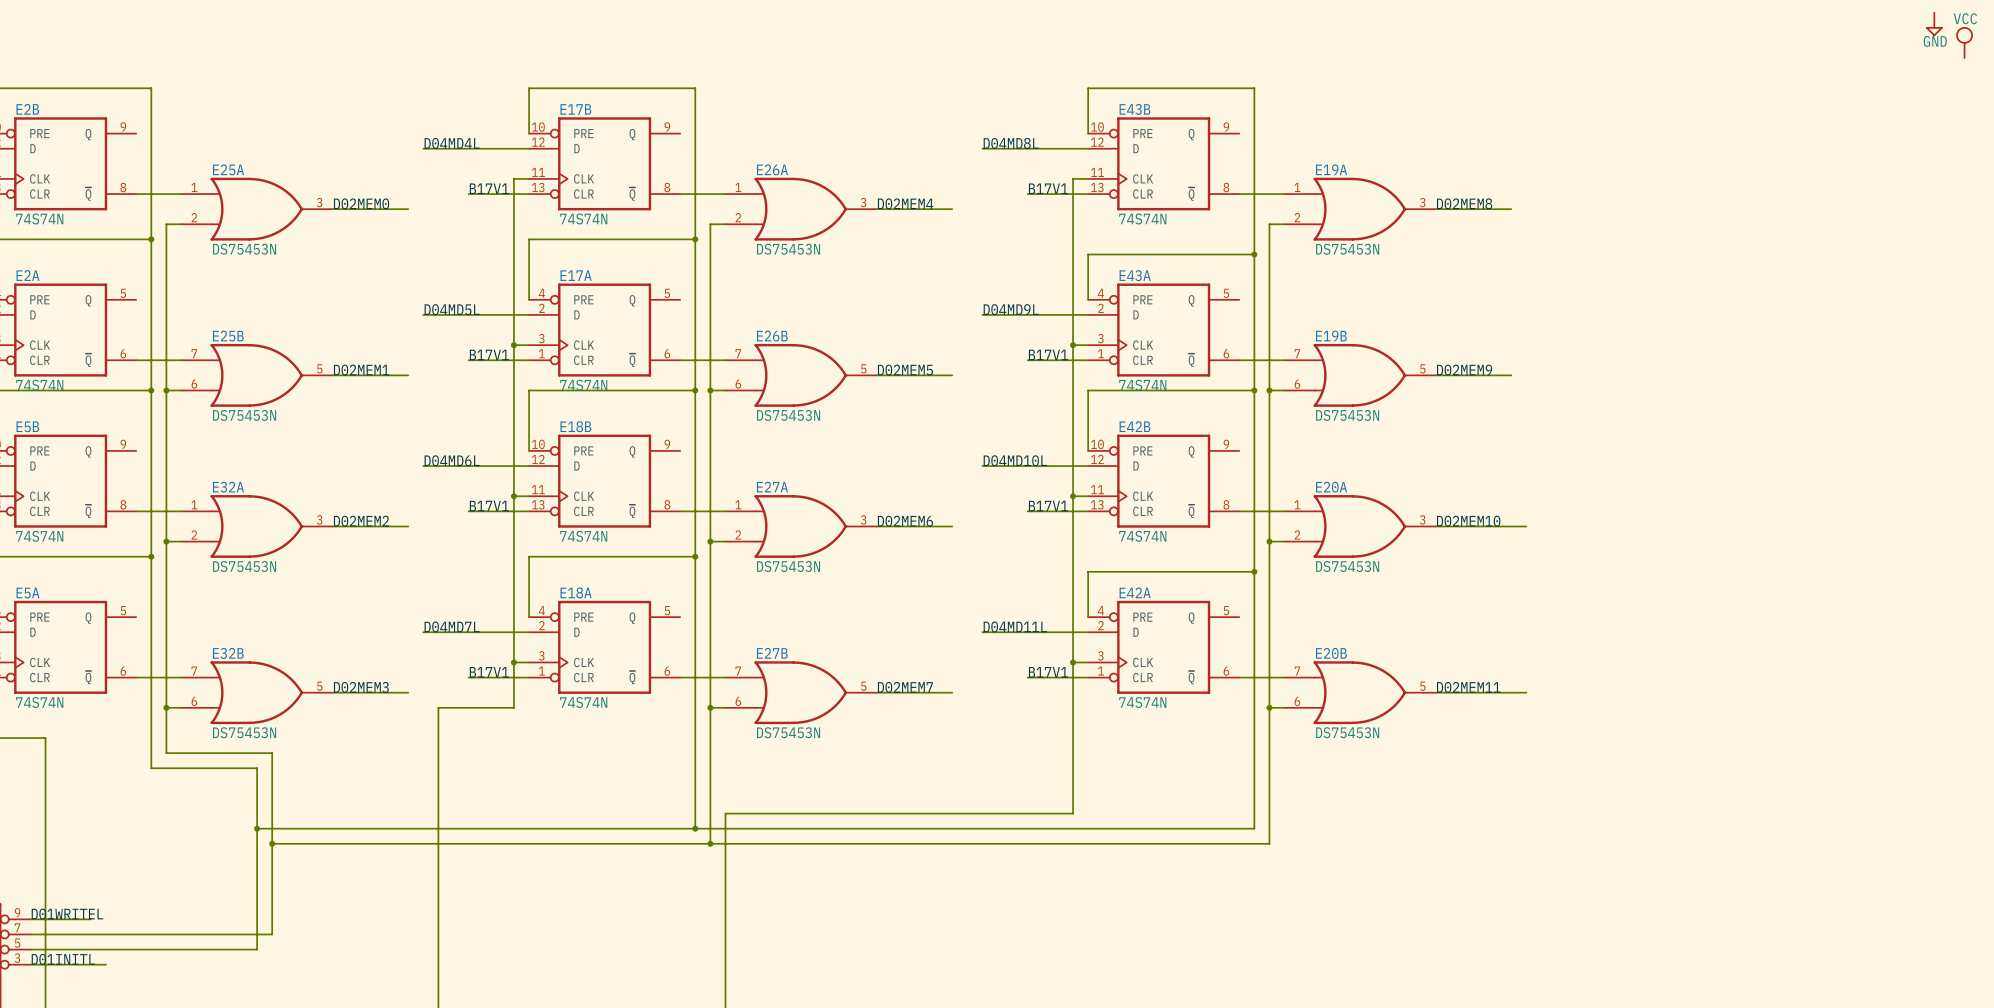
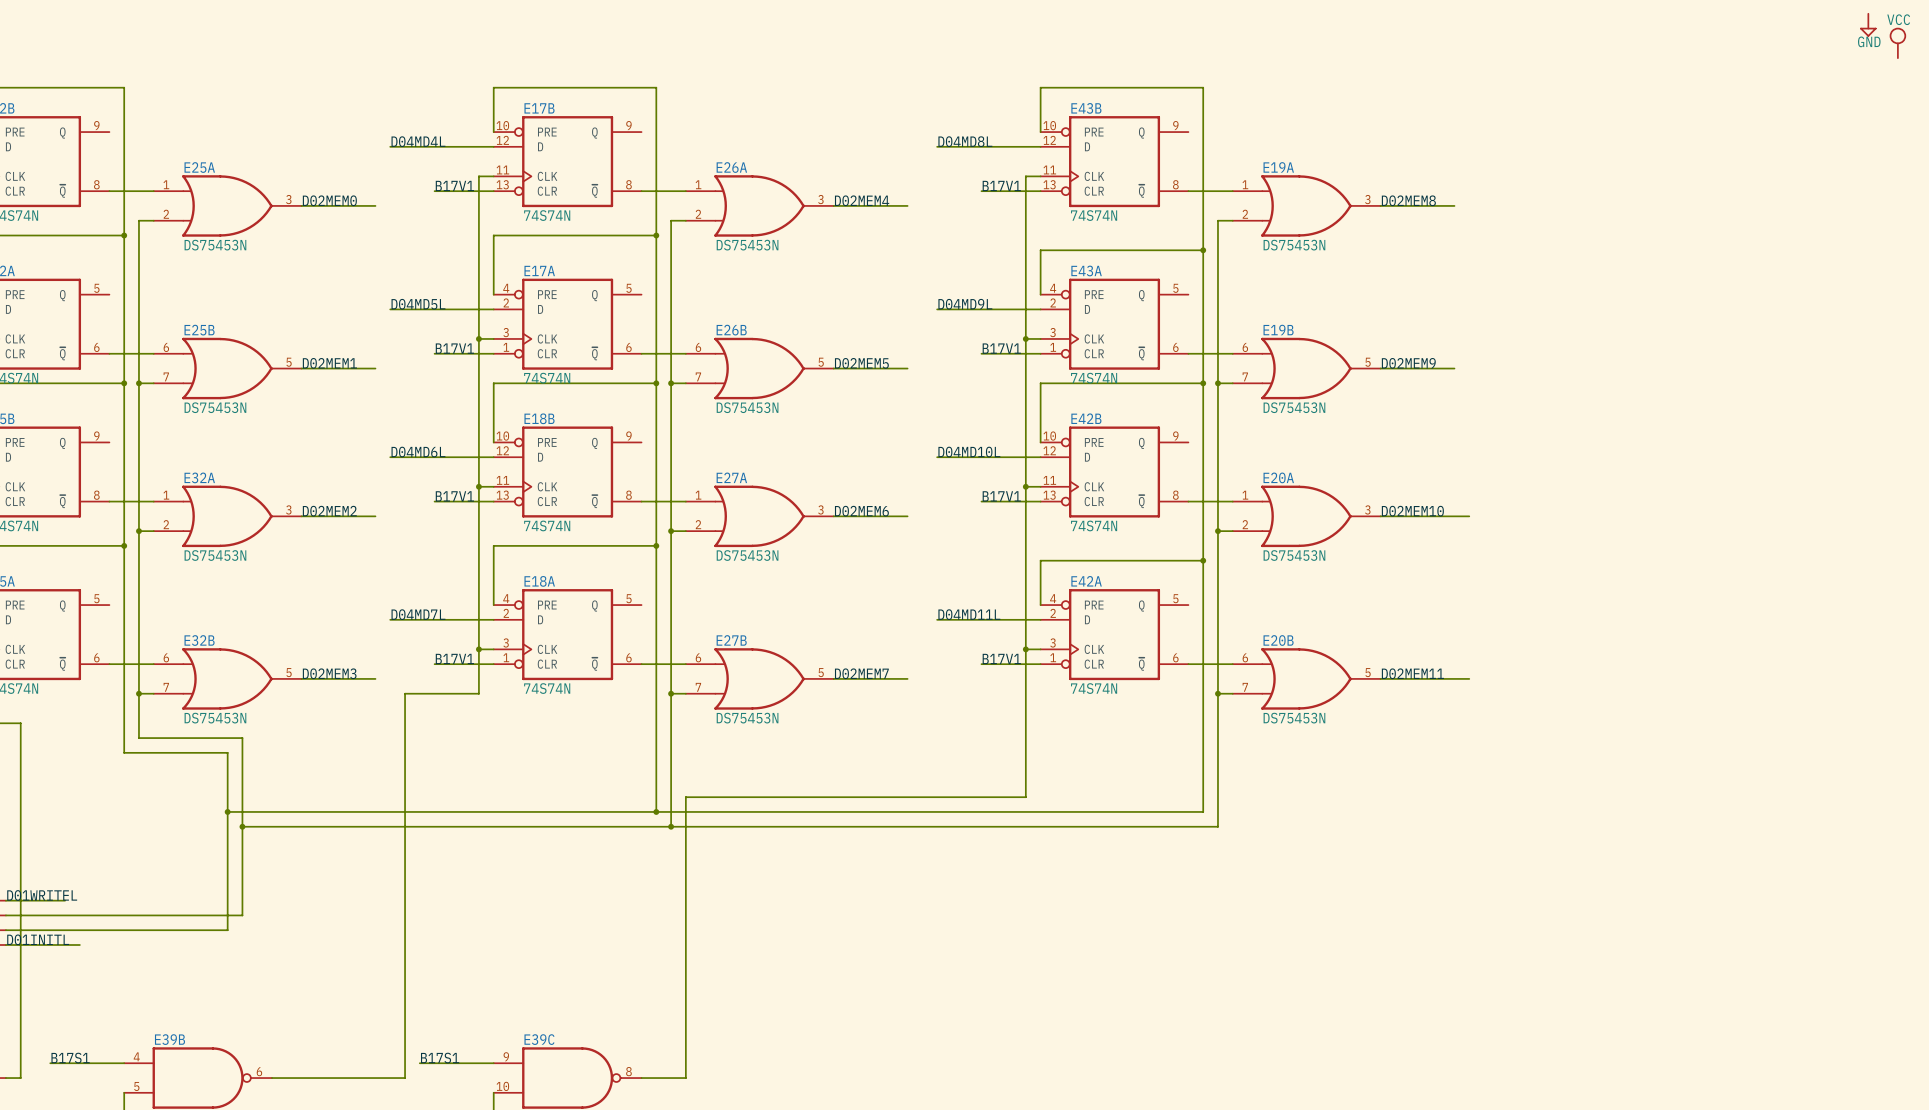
E25B symbol: [181, 343, 333, 407] -> [153, 337, 302, 400]
E26B symbol: [725, 343, 877, 407] -> [685, 337, 834, 400]
E19B symbol: [1284, 343, 1436, 407] -> [1232, 337, 1381, 400]
E32B symbol: [181, 661, 333, 725] -> [153, 648, 302, 710]
E27B symbol: [725, 661, 877, 725] -> [685, 648, 834, 710]
E20B symbol: [1284, 661, 1436, 725] -> [1232, 648, 1381, 710]

